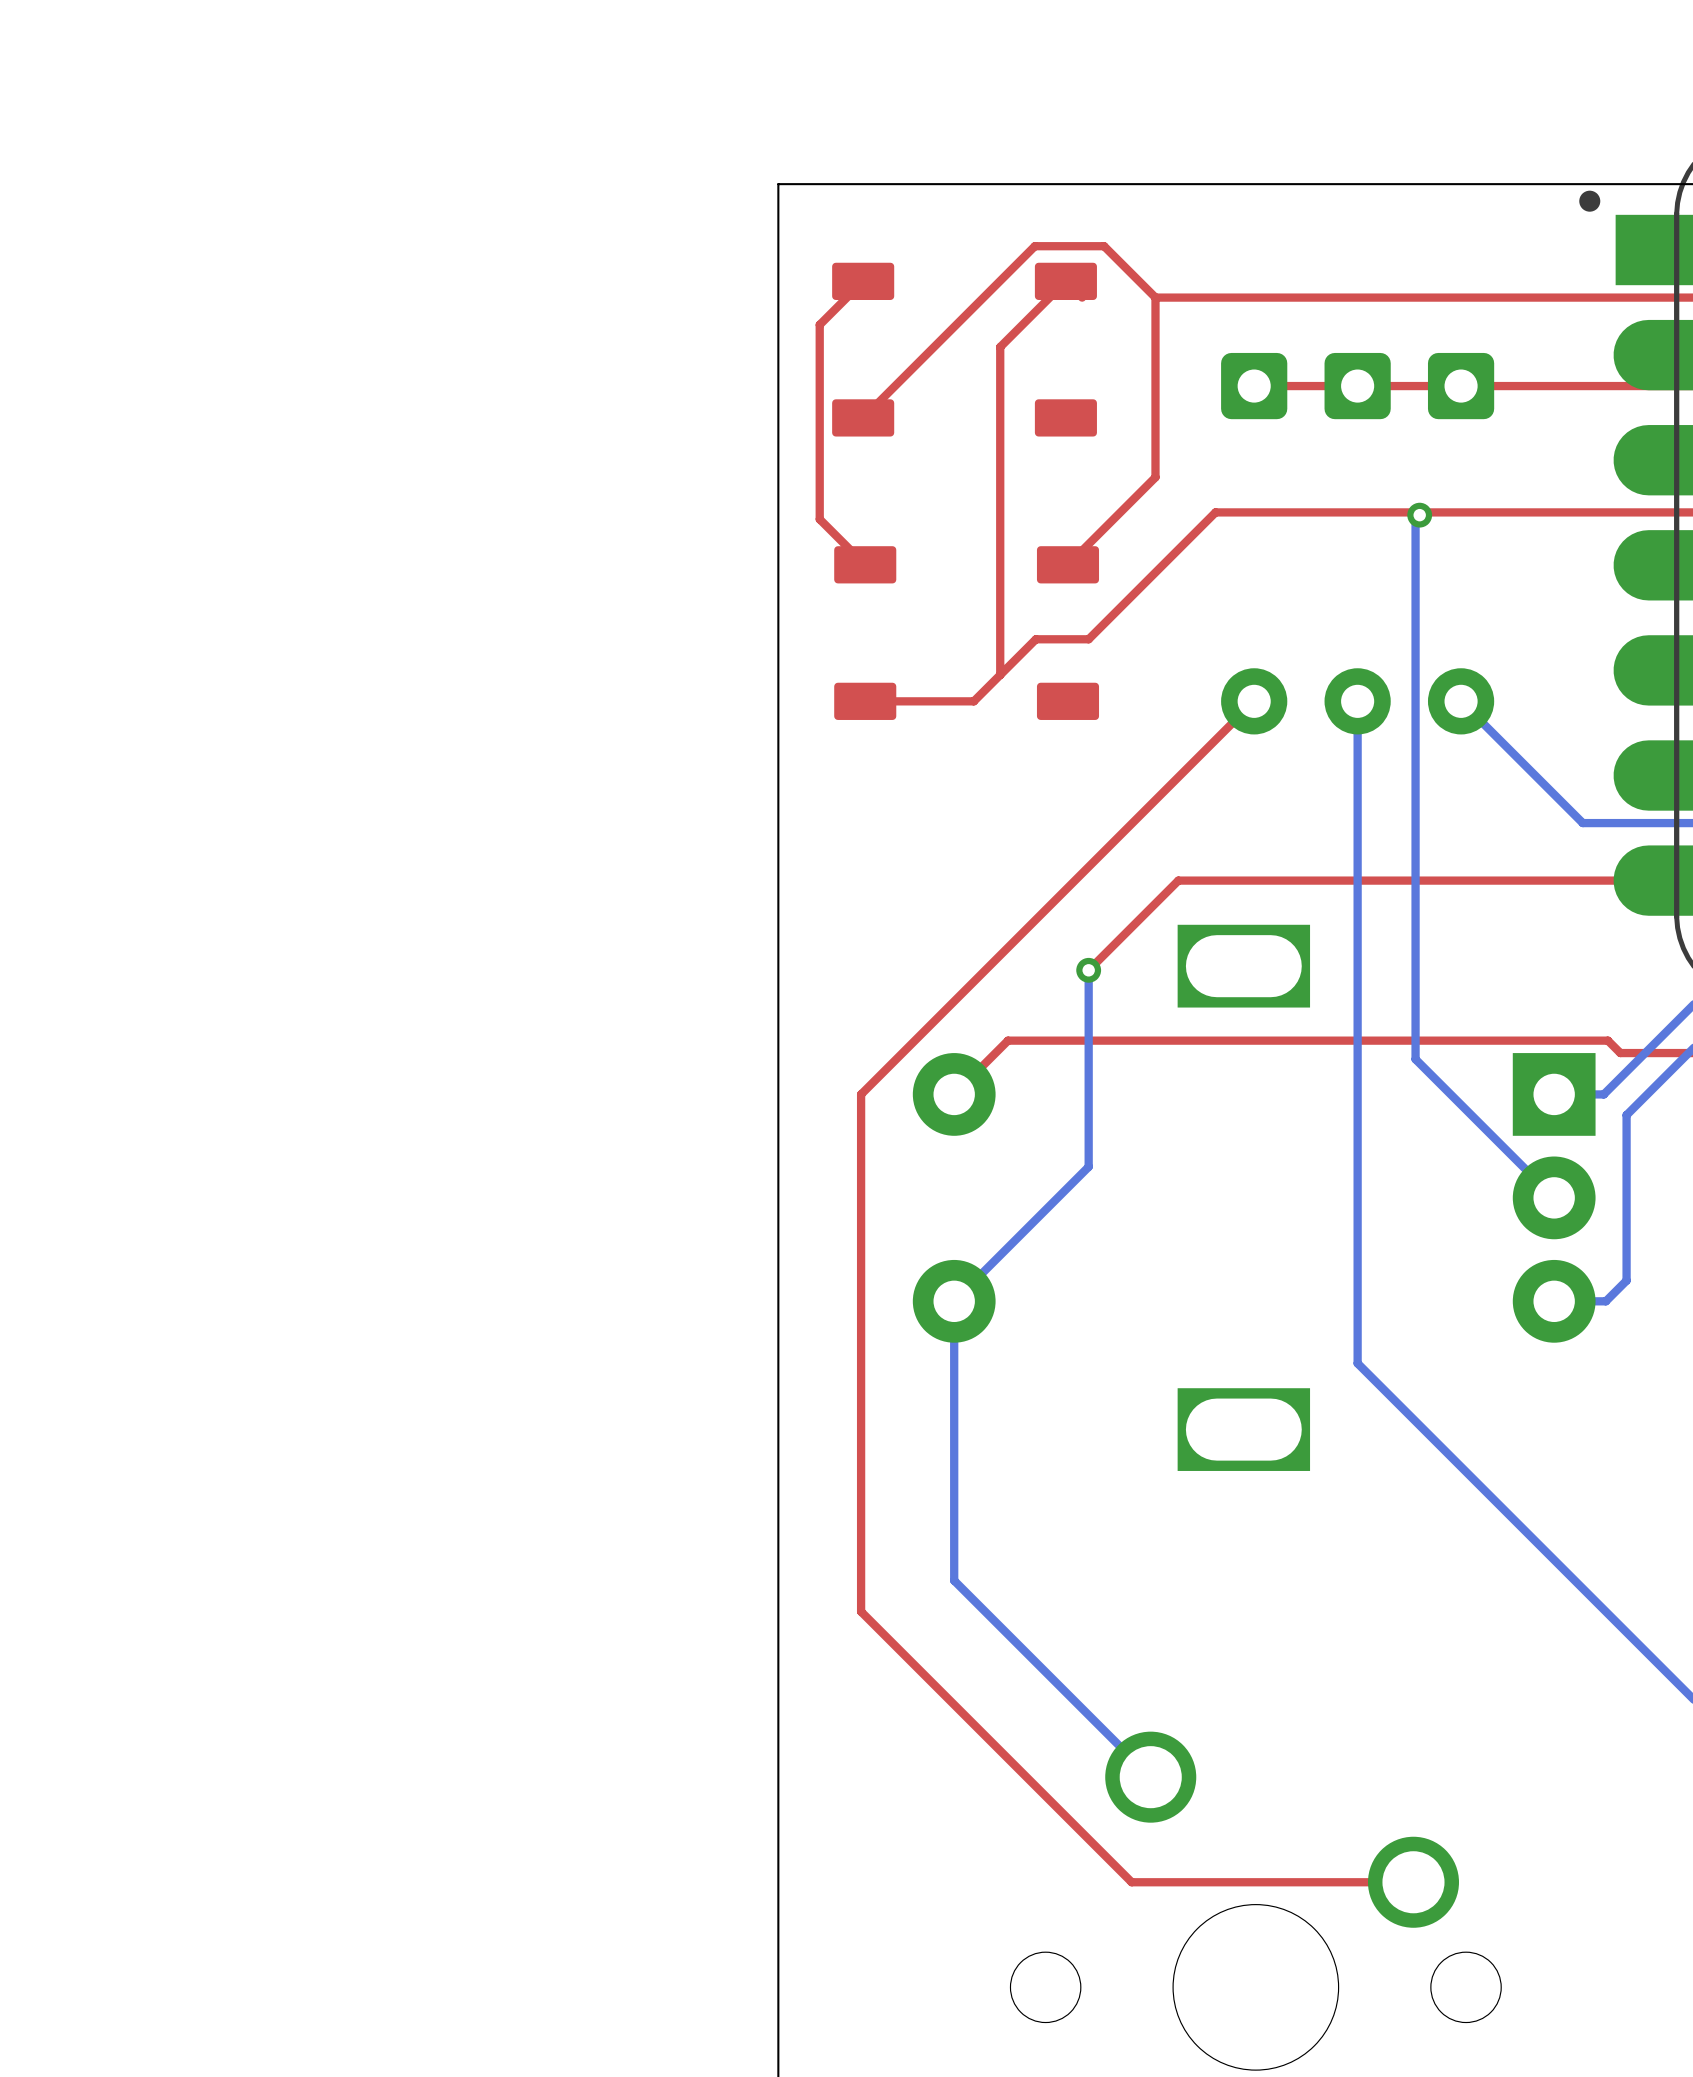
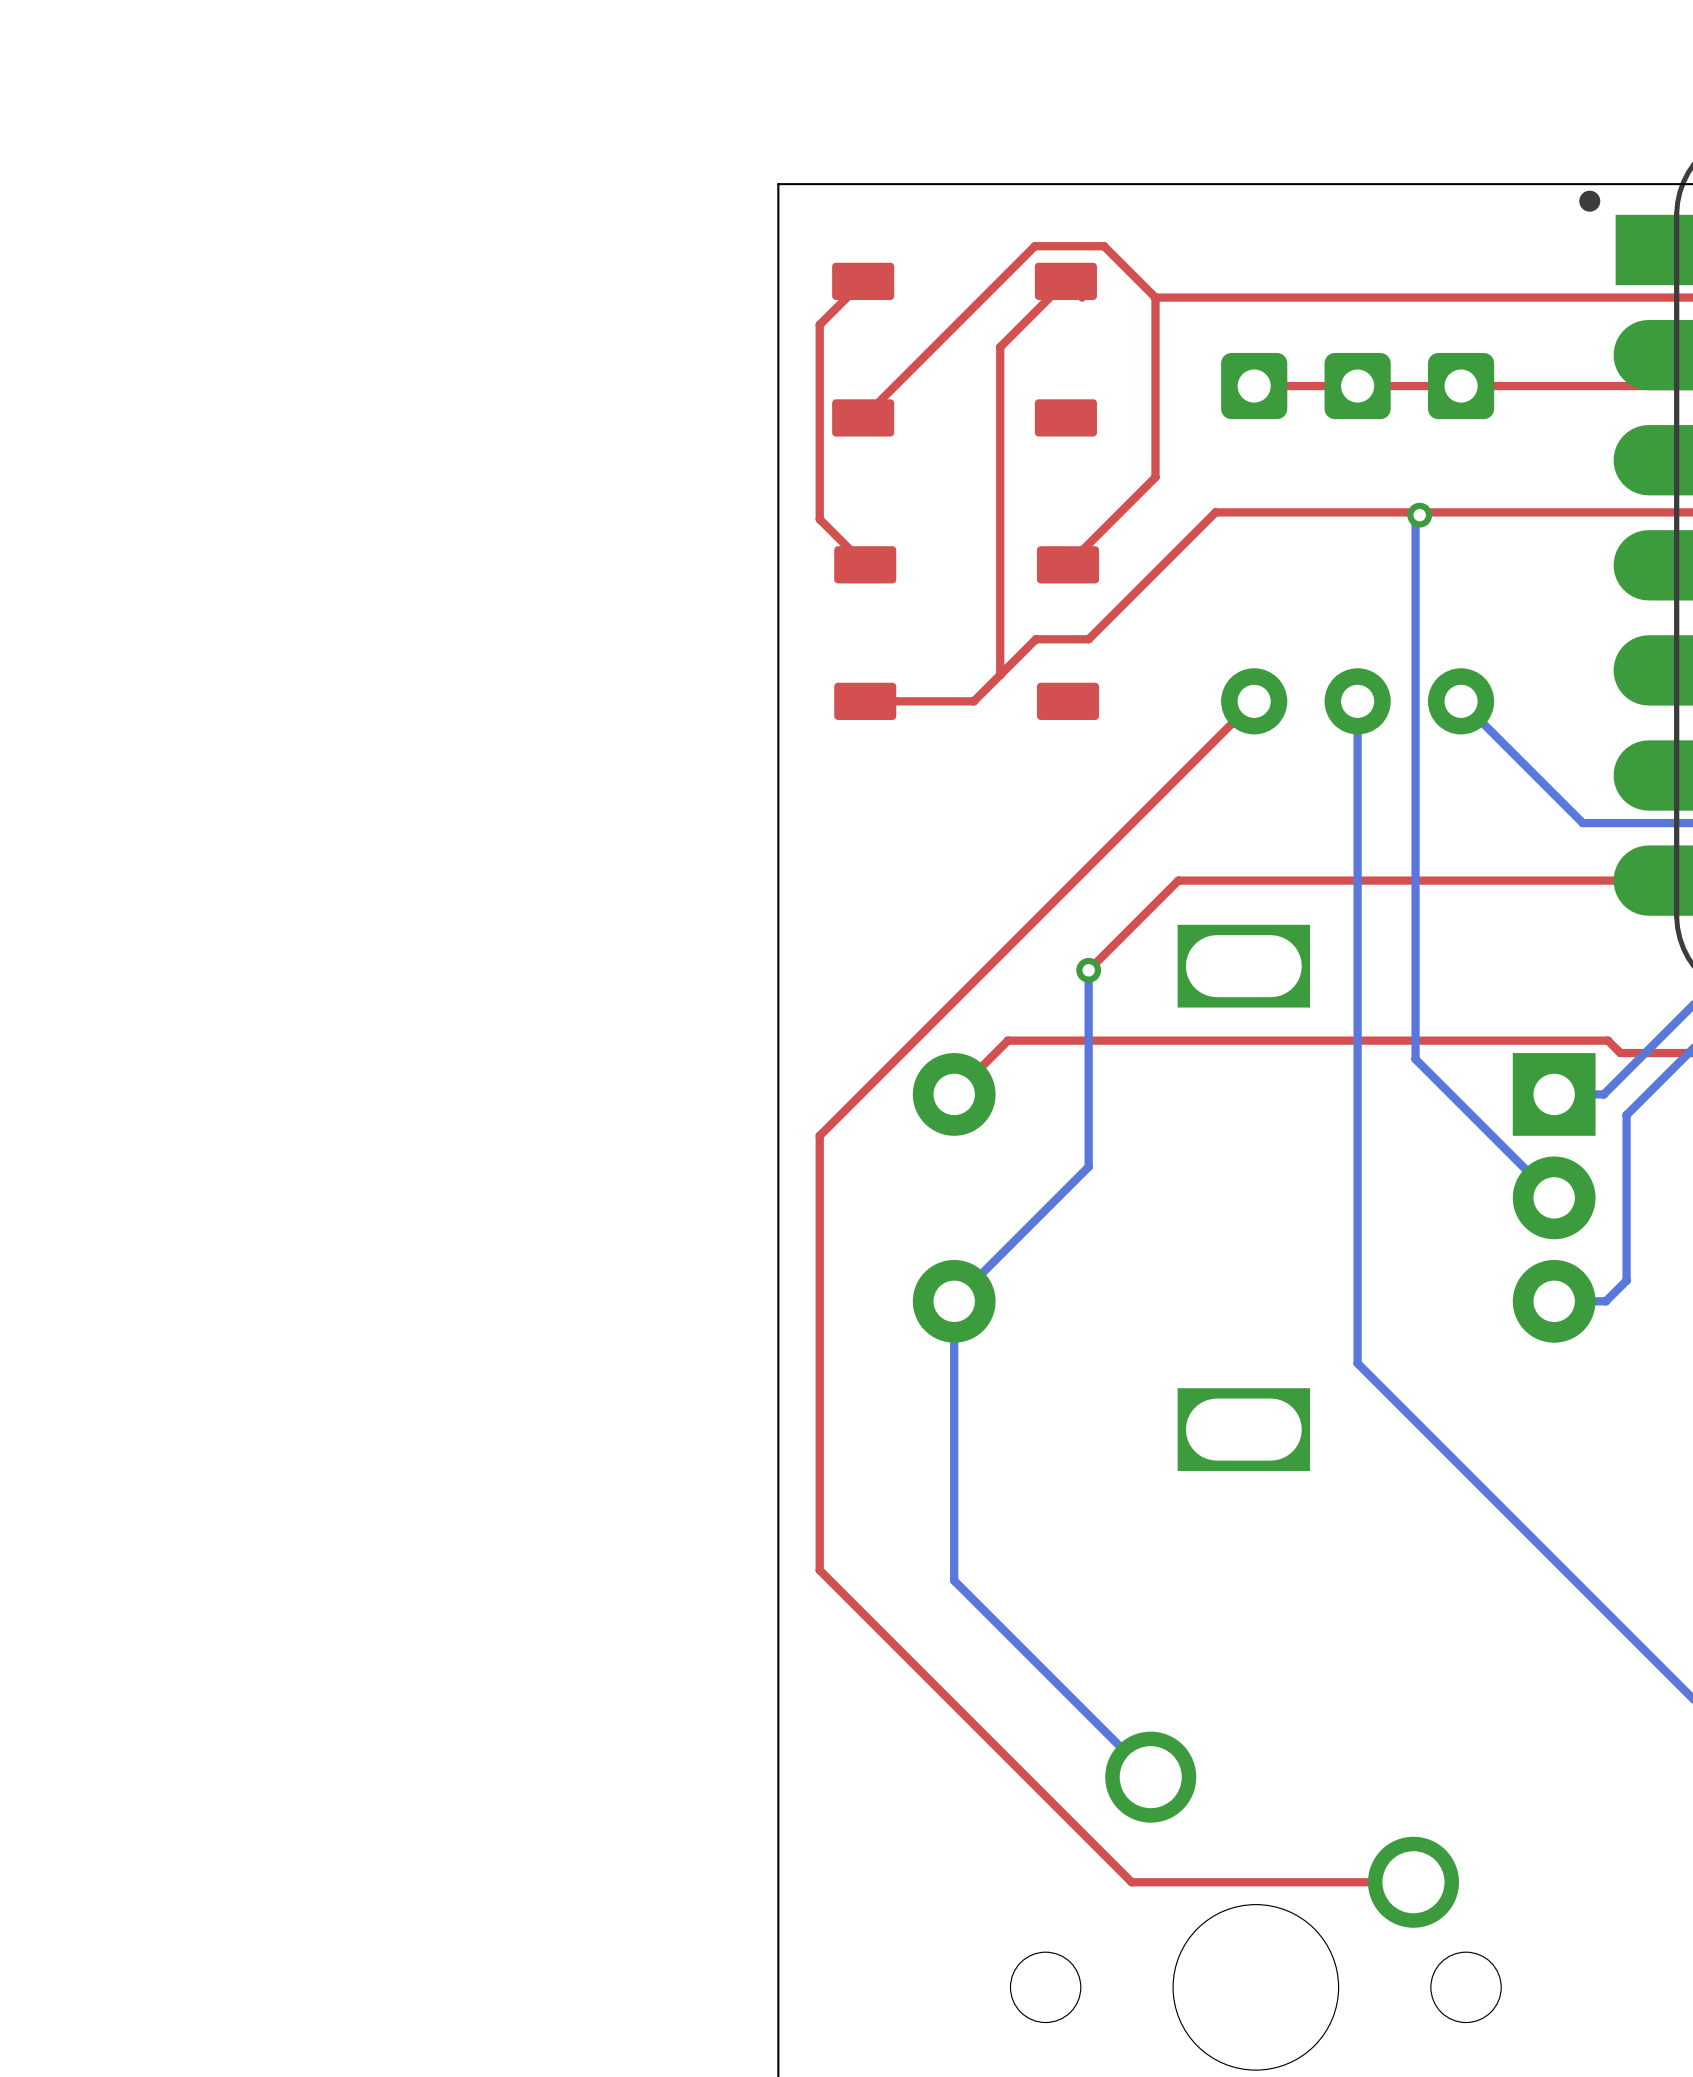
top track: (861, 1094) (861, 1611) -> (861, 1094) (819, 1135) (819, 1570) (861, 1611)

